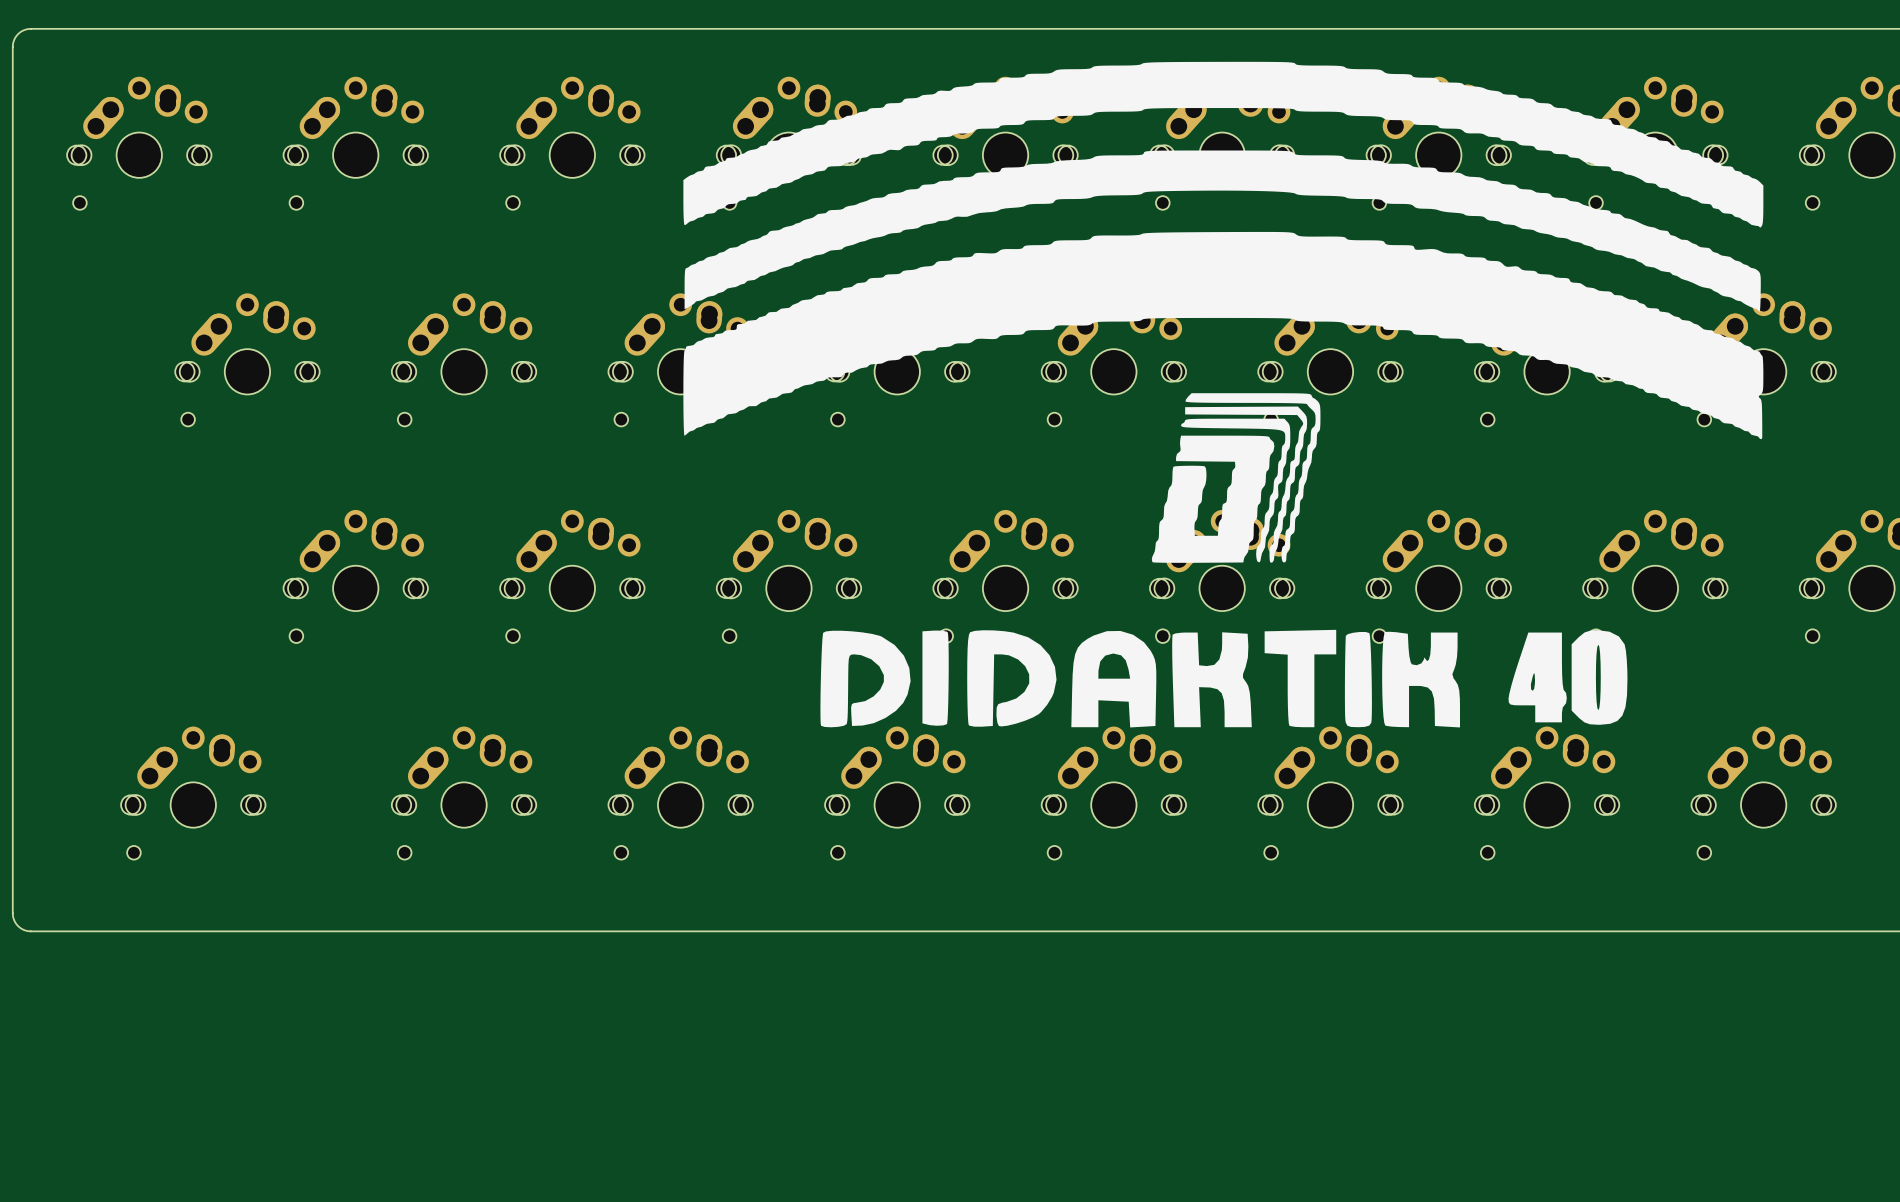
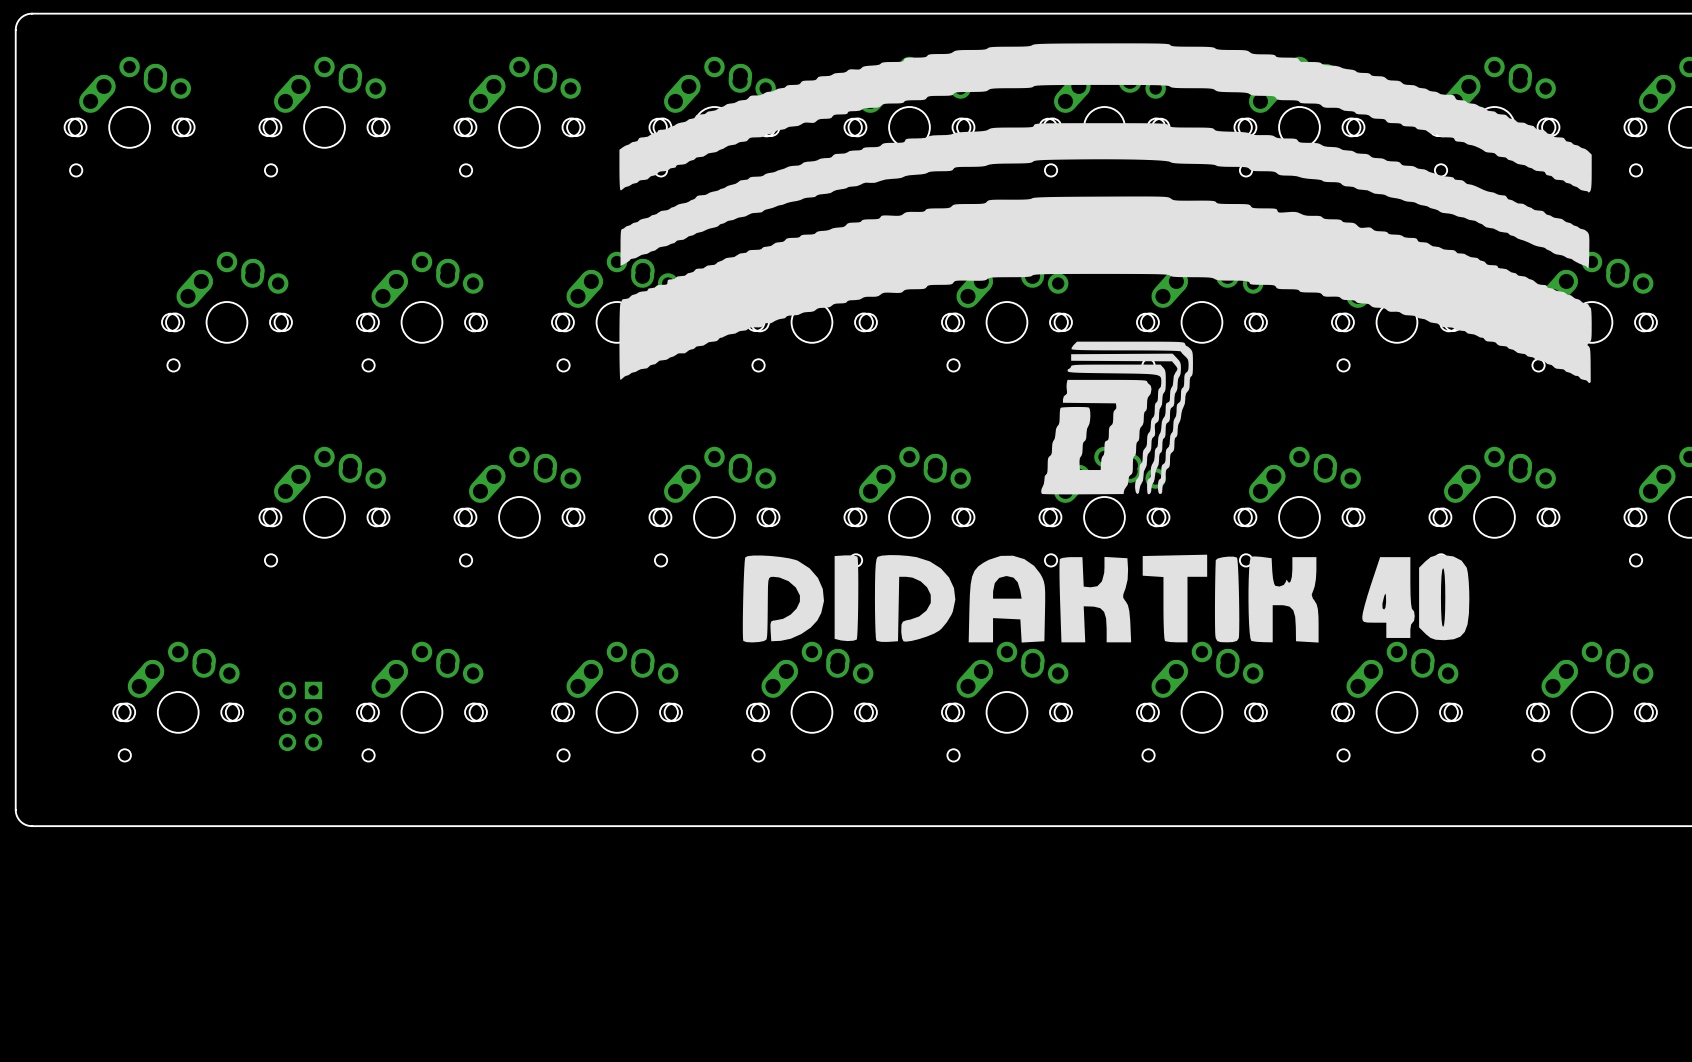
part: none -> (300, 716)

